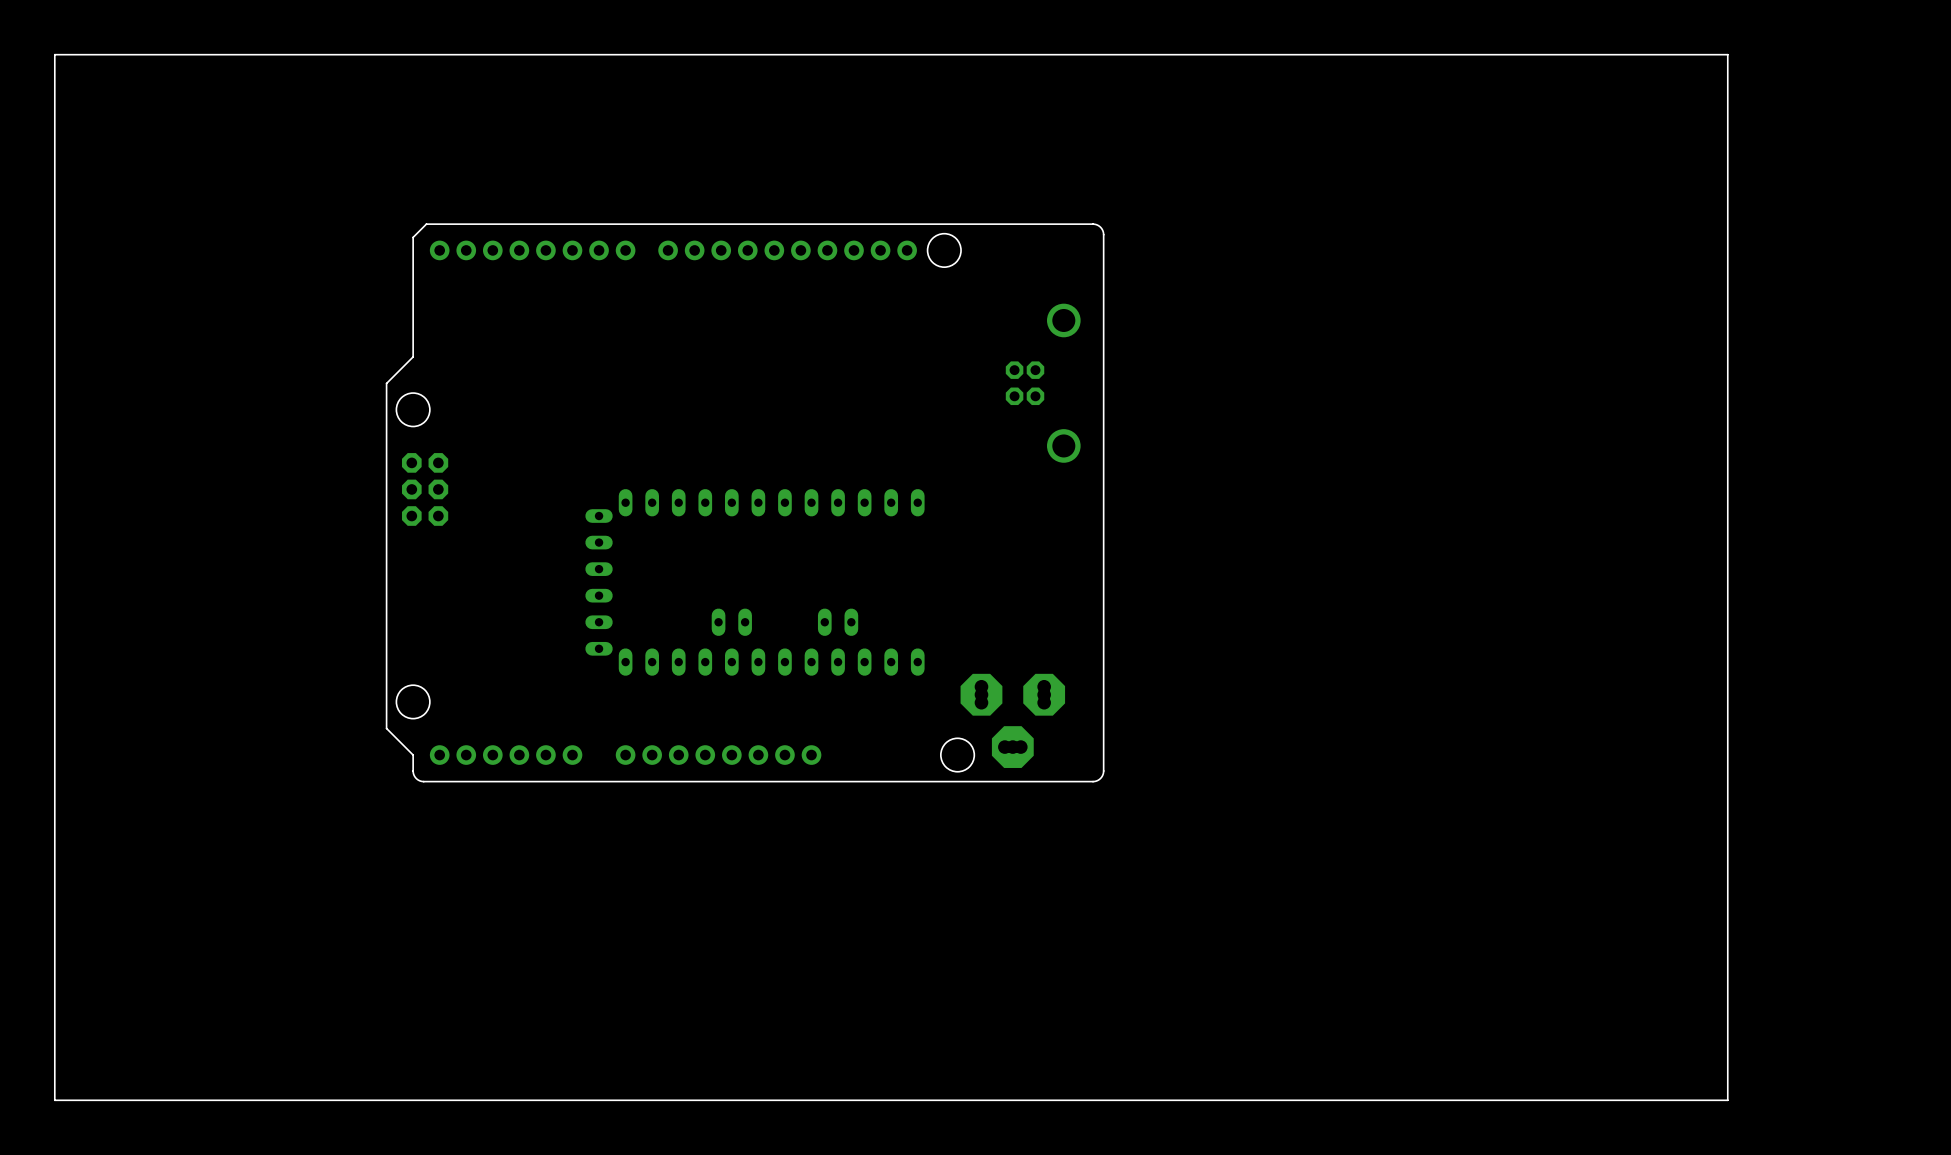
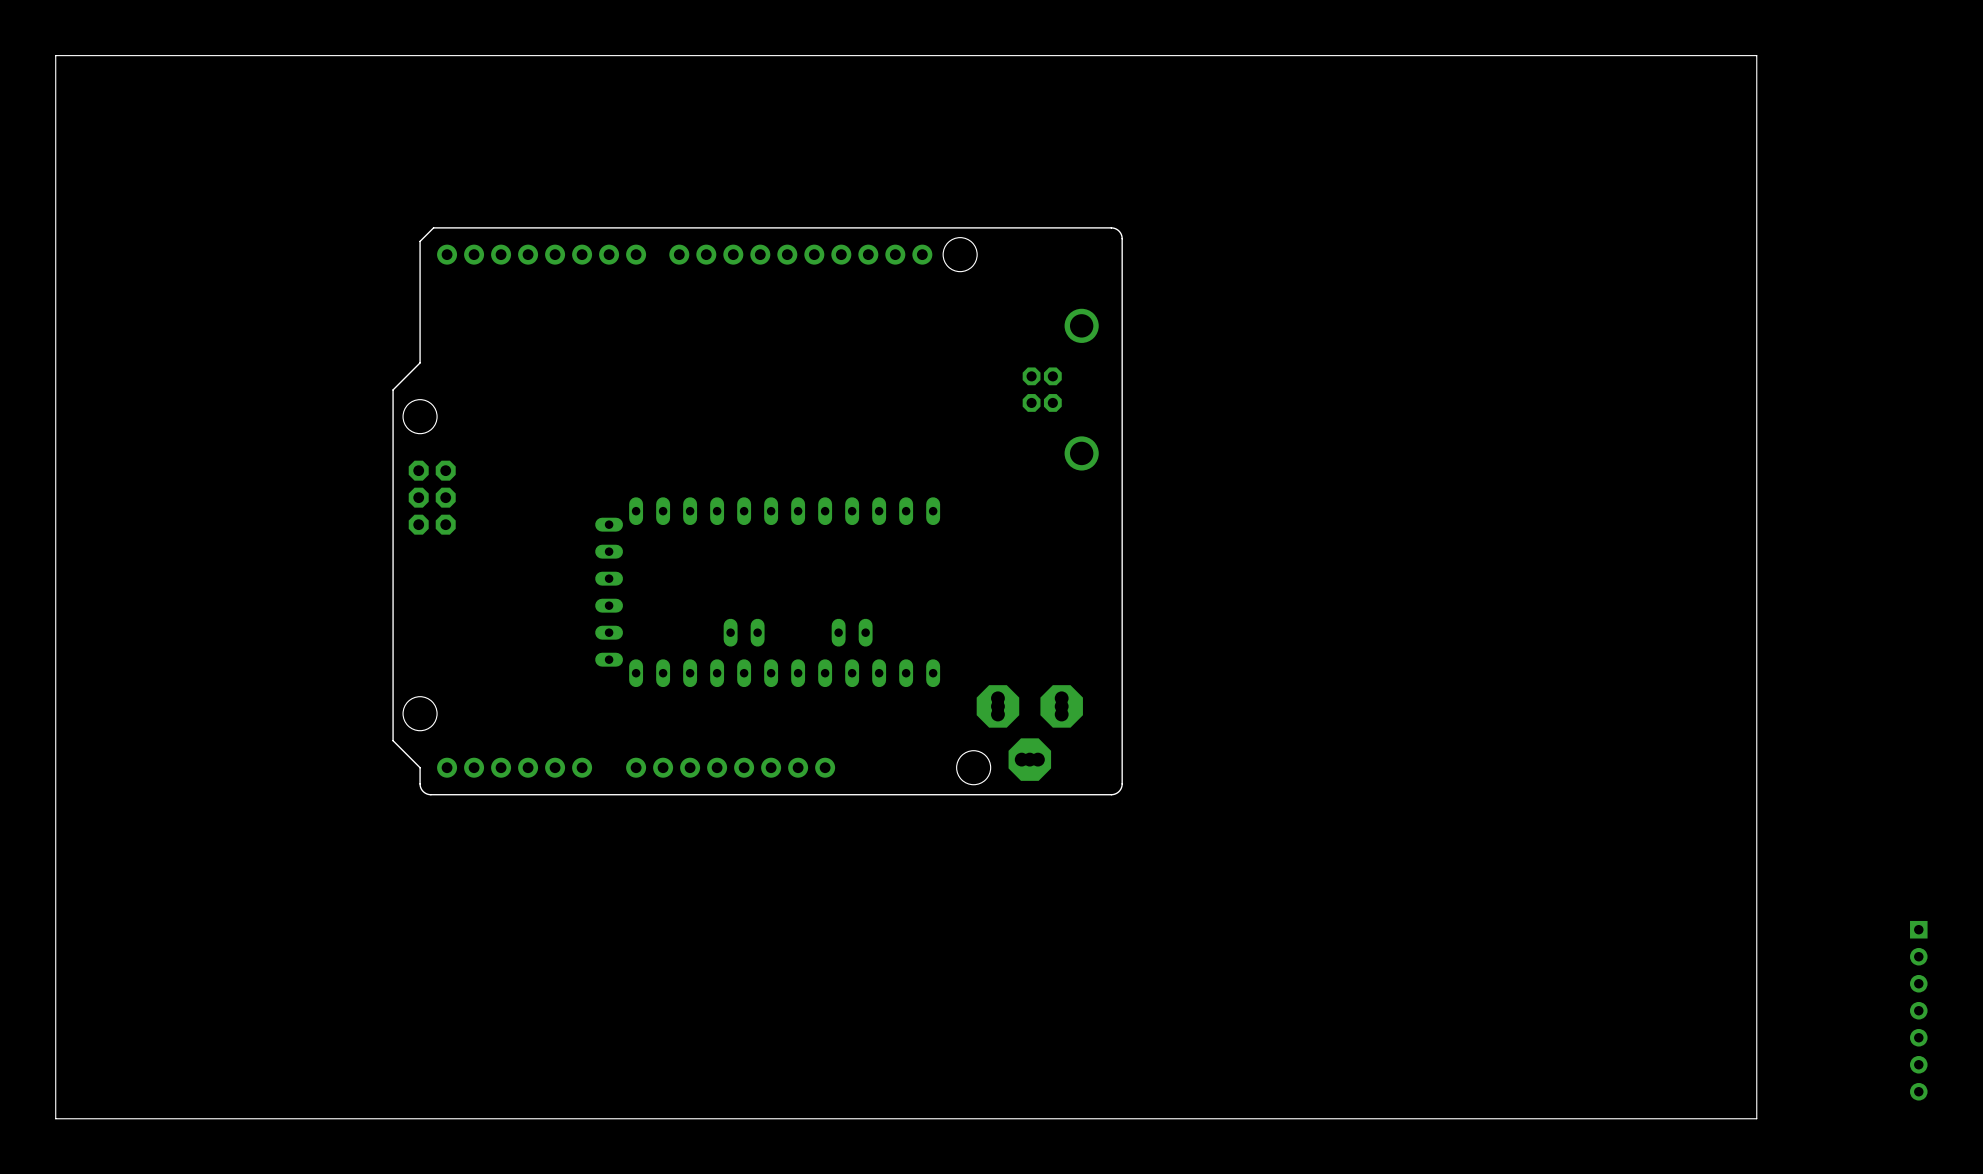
part: none -> (1918, 1010)

